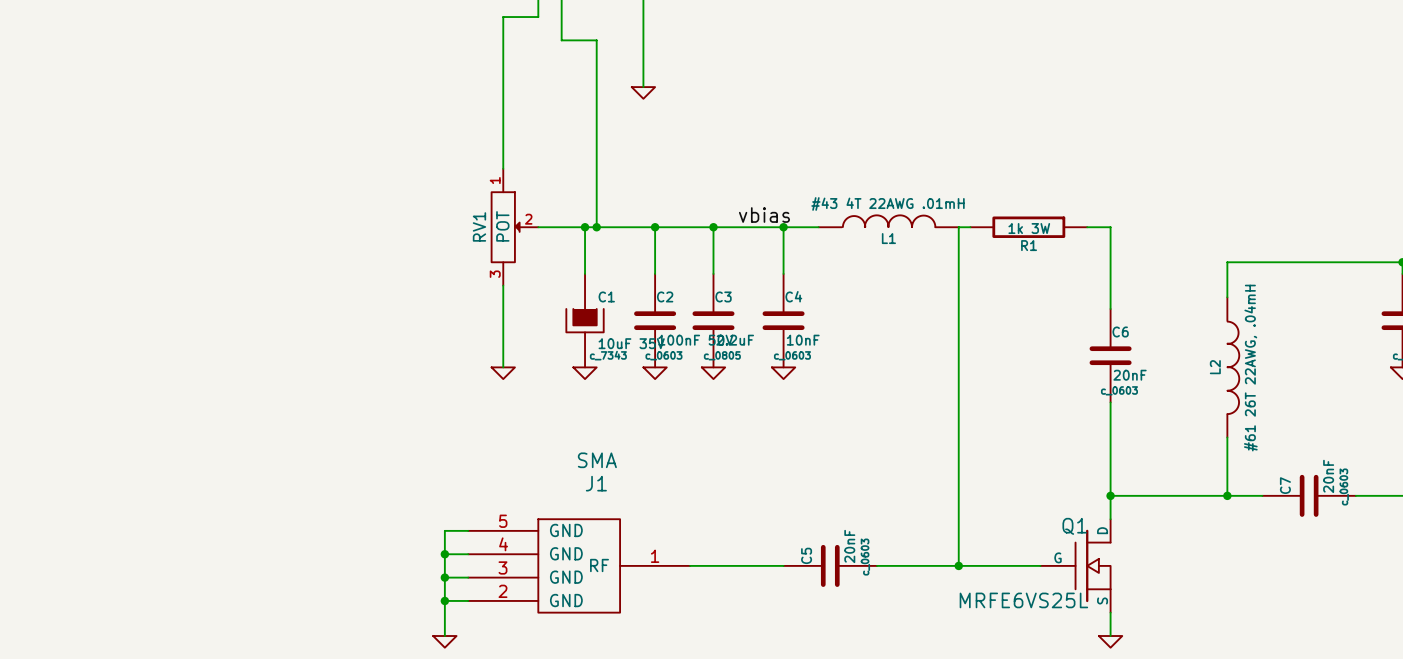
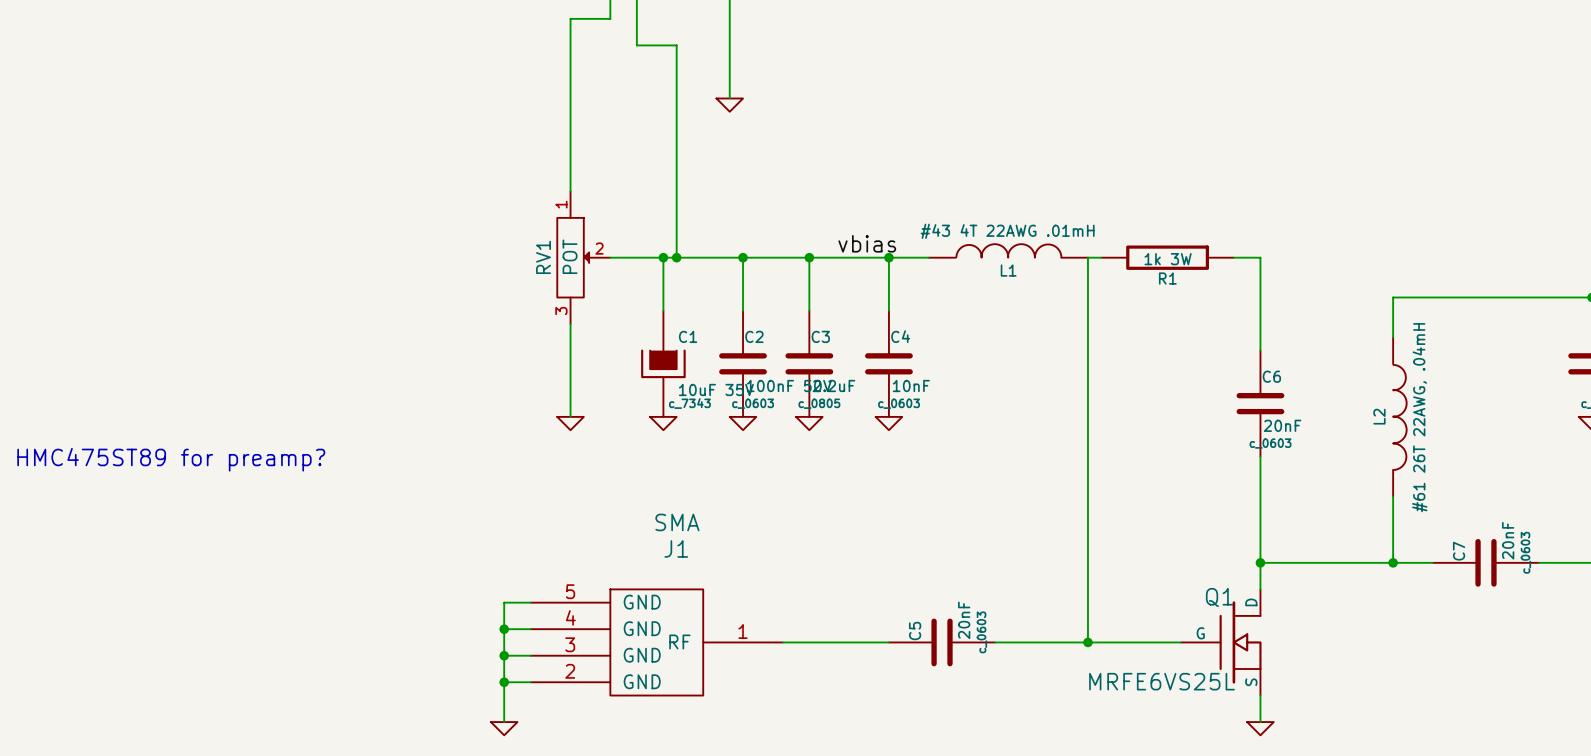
text: none -> HMC475ST89 for preamp? (171, 459)

